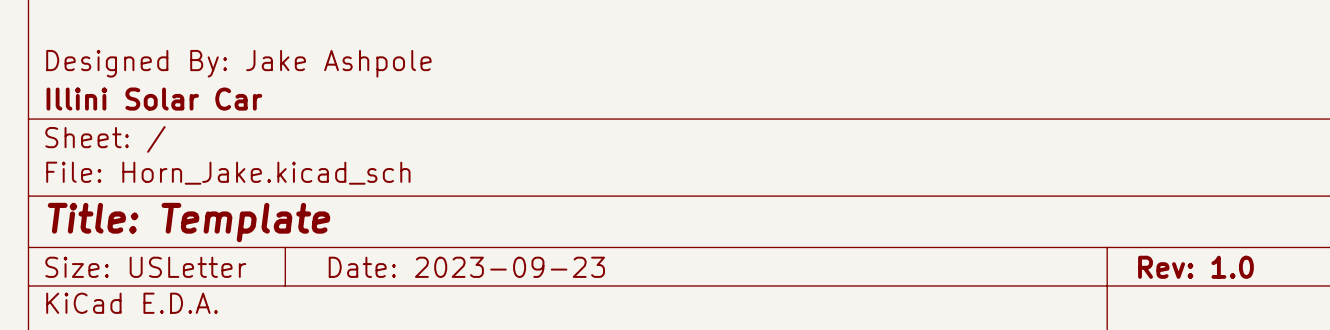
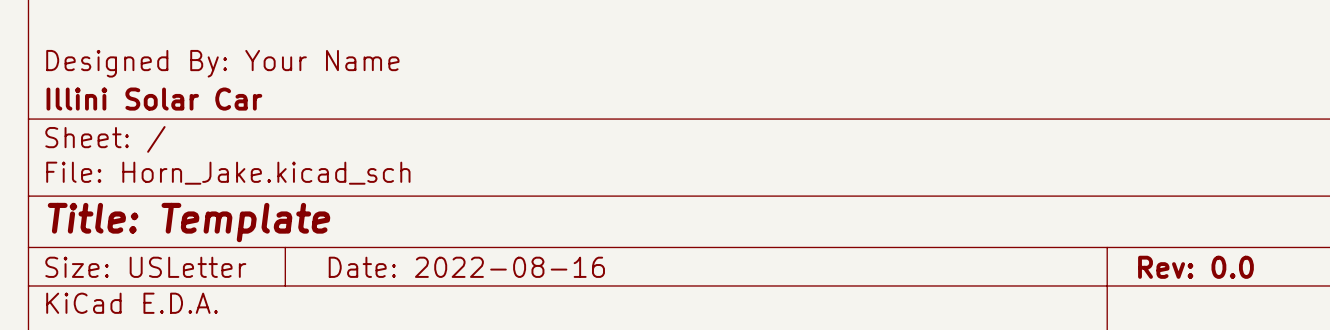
title block: Designed By: Jake Ashpole (238, 63) -> Designed By: Your Name (222, 63)
title block: Date: 2023-09-23 (466, 267) -> Date: 2022-08-16 (466, 267)
title block: Rev: 1.0 (1195, 267) -> Rev: 0.0 (1195, 267)

